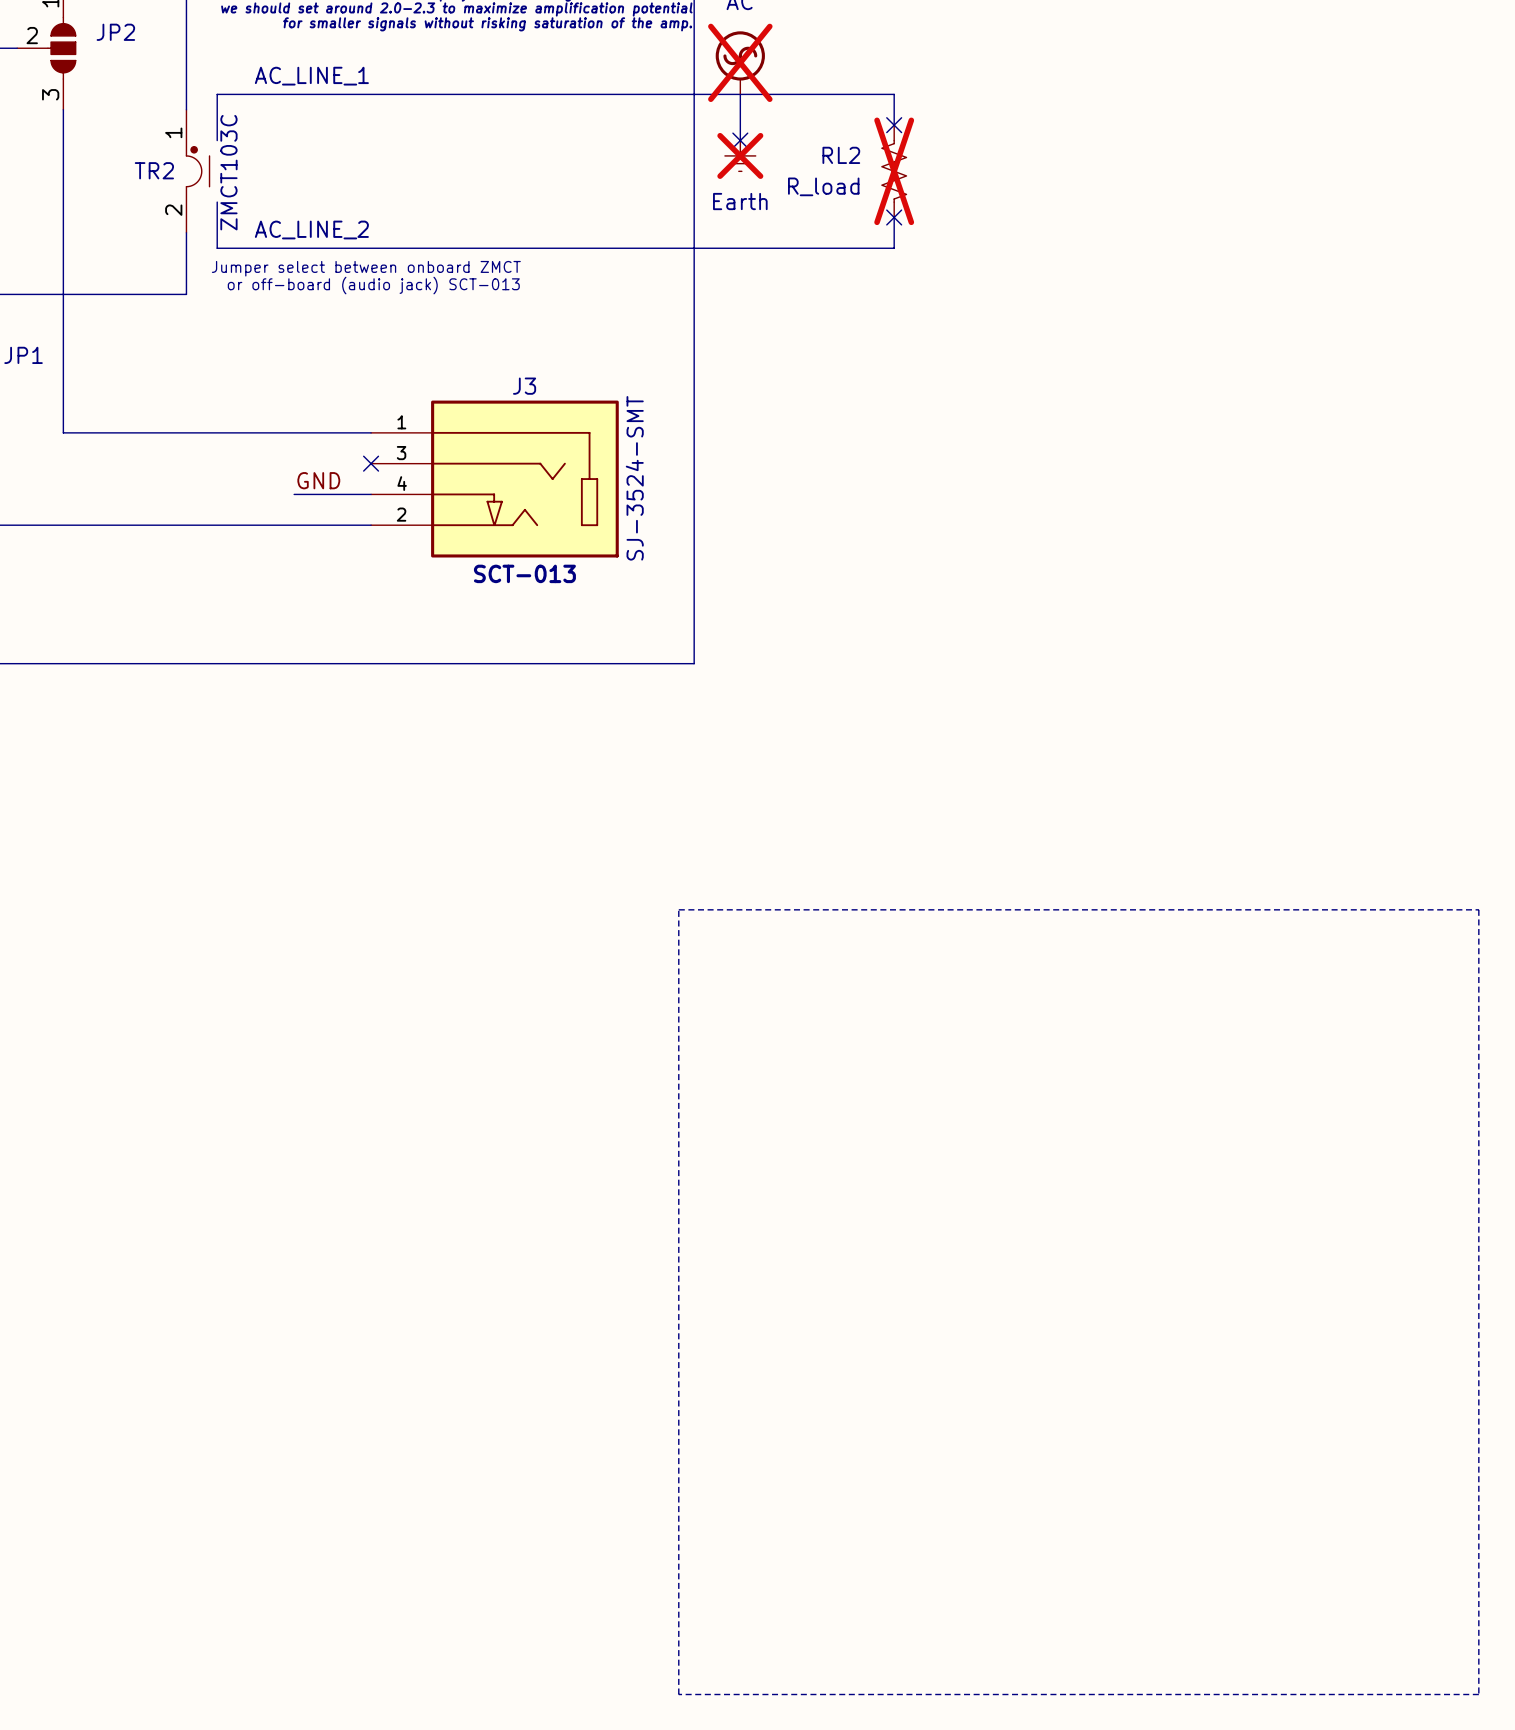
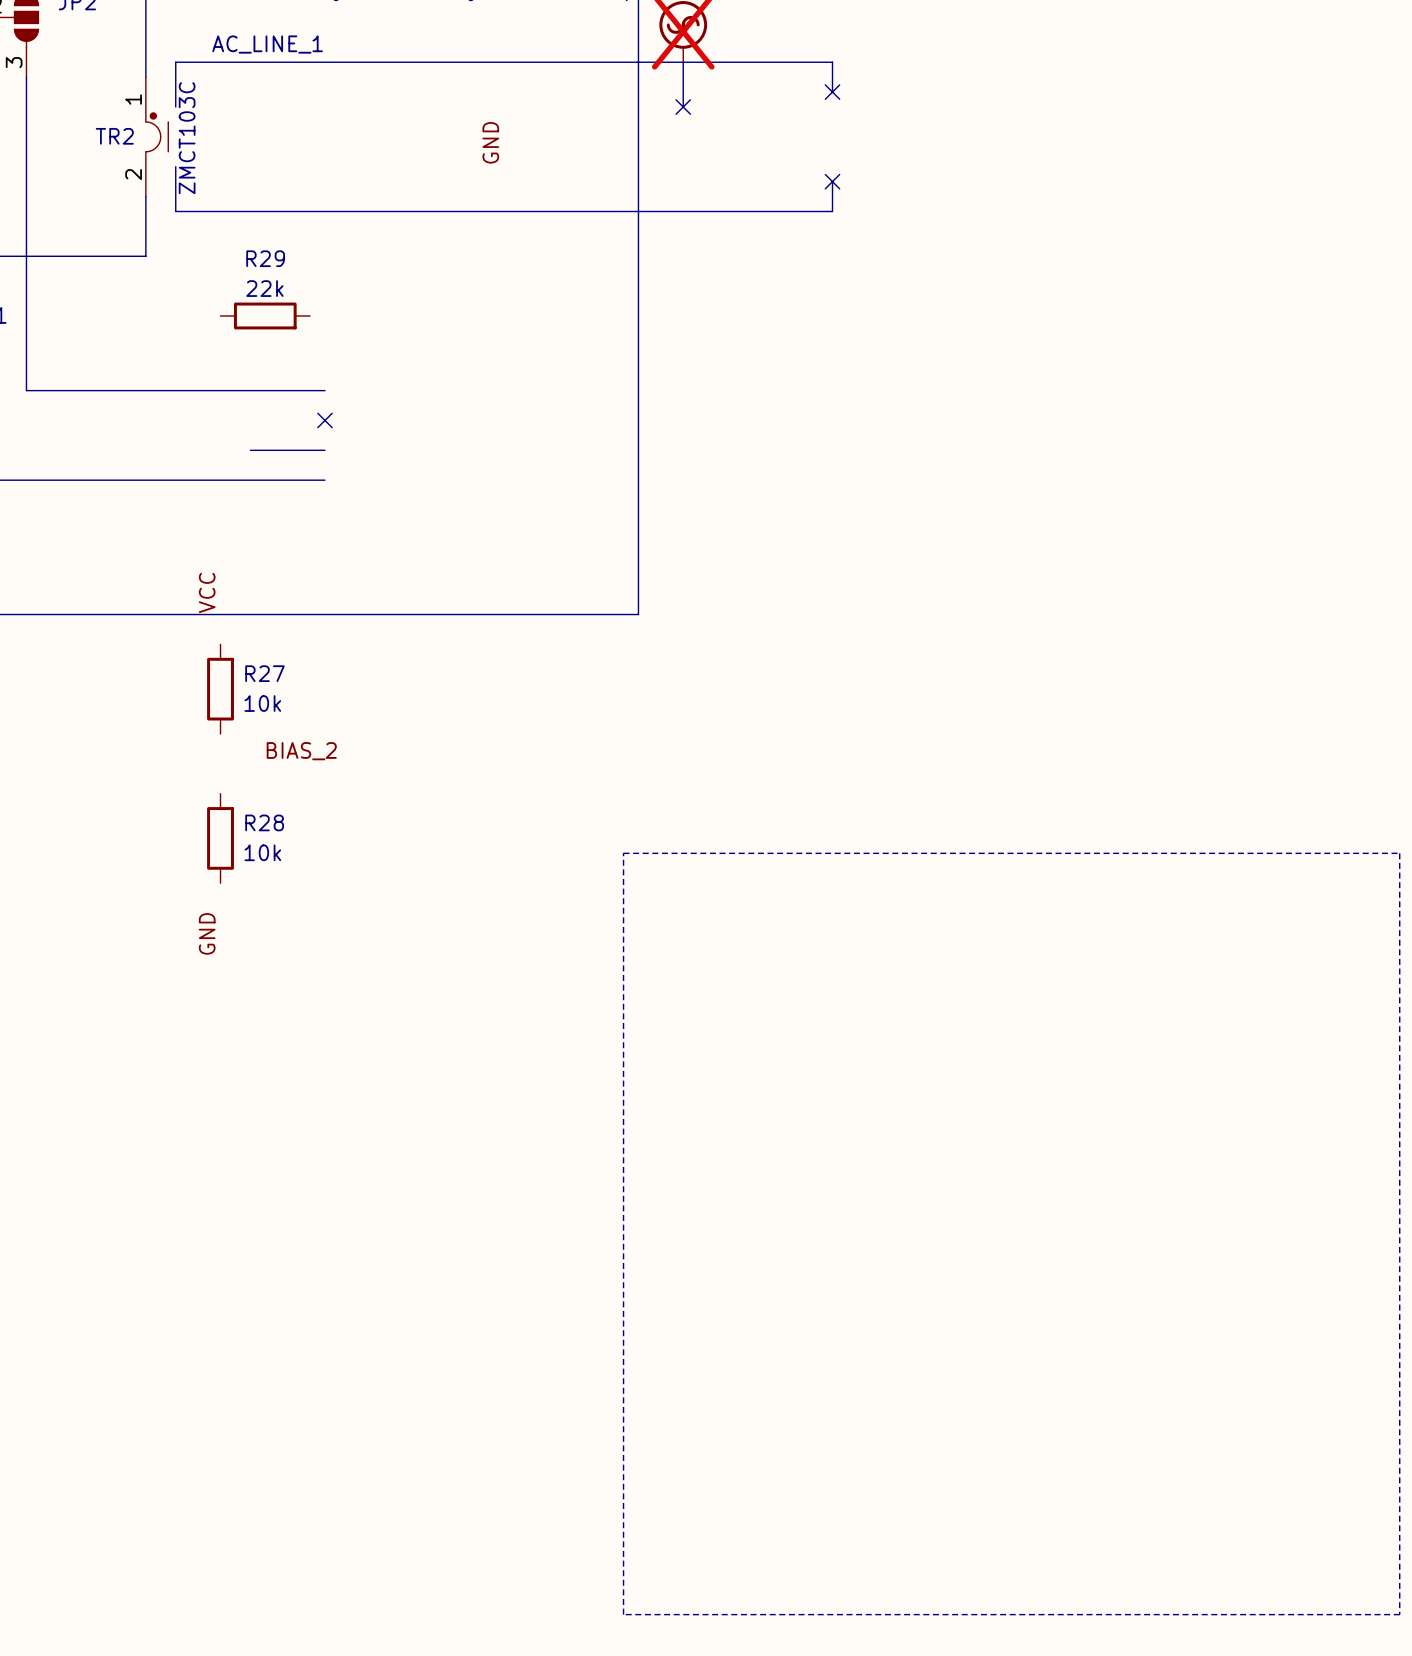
power symbol: Earth (740, 155) -> none
RL2: R_load (894, 171) -> none
label: none -> GND (490, 142)
text: AC_LINE_2 (311, 230) -> none
text: Jumper select between onboard ZMCT (366, 268) -> none
text: or off-board (audio jack) SCT-013 (373, 285) -> none
R29: none -> 22k (265, 315)
J3: SJ-3524-SMT (494, 479) -> none
label: GND (318, 480) -> none
text: SCT-013 (524, 573) -> none
label: none -> VCC (207, 592)
R27: none -> 10k (220, 689)
label: none -> BIAS_2 (301, 751)
R28: none -> 10k (220, 838)
label: none -> GND (207, 933)

